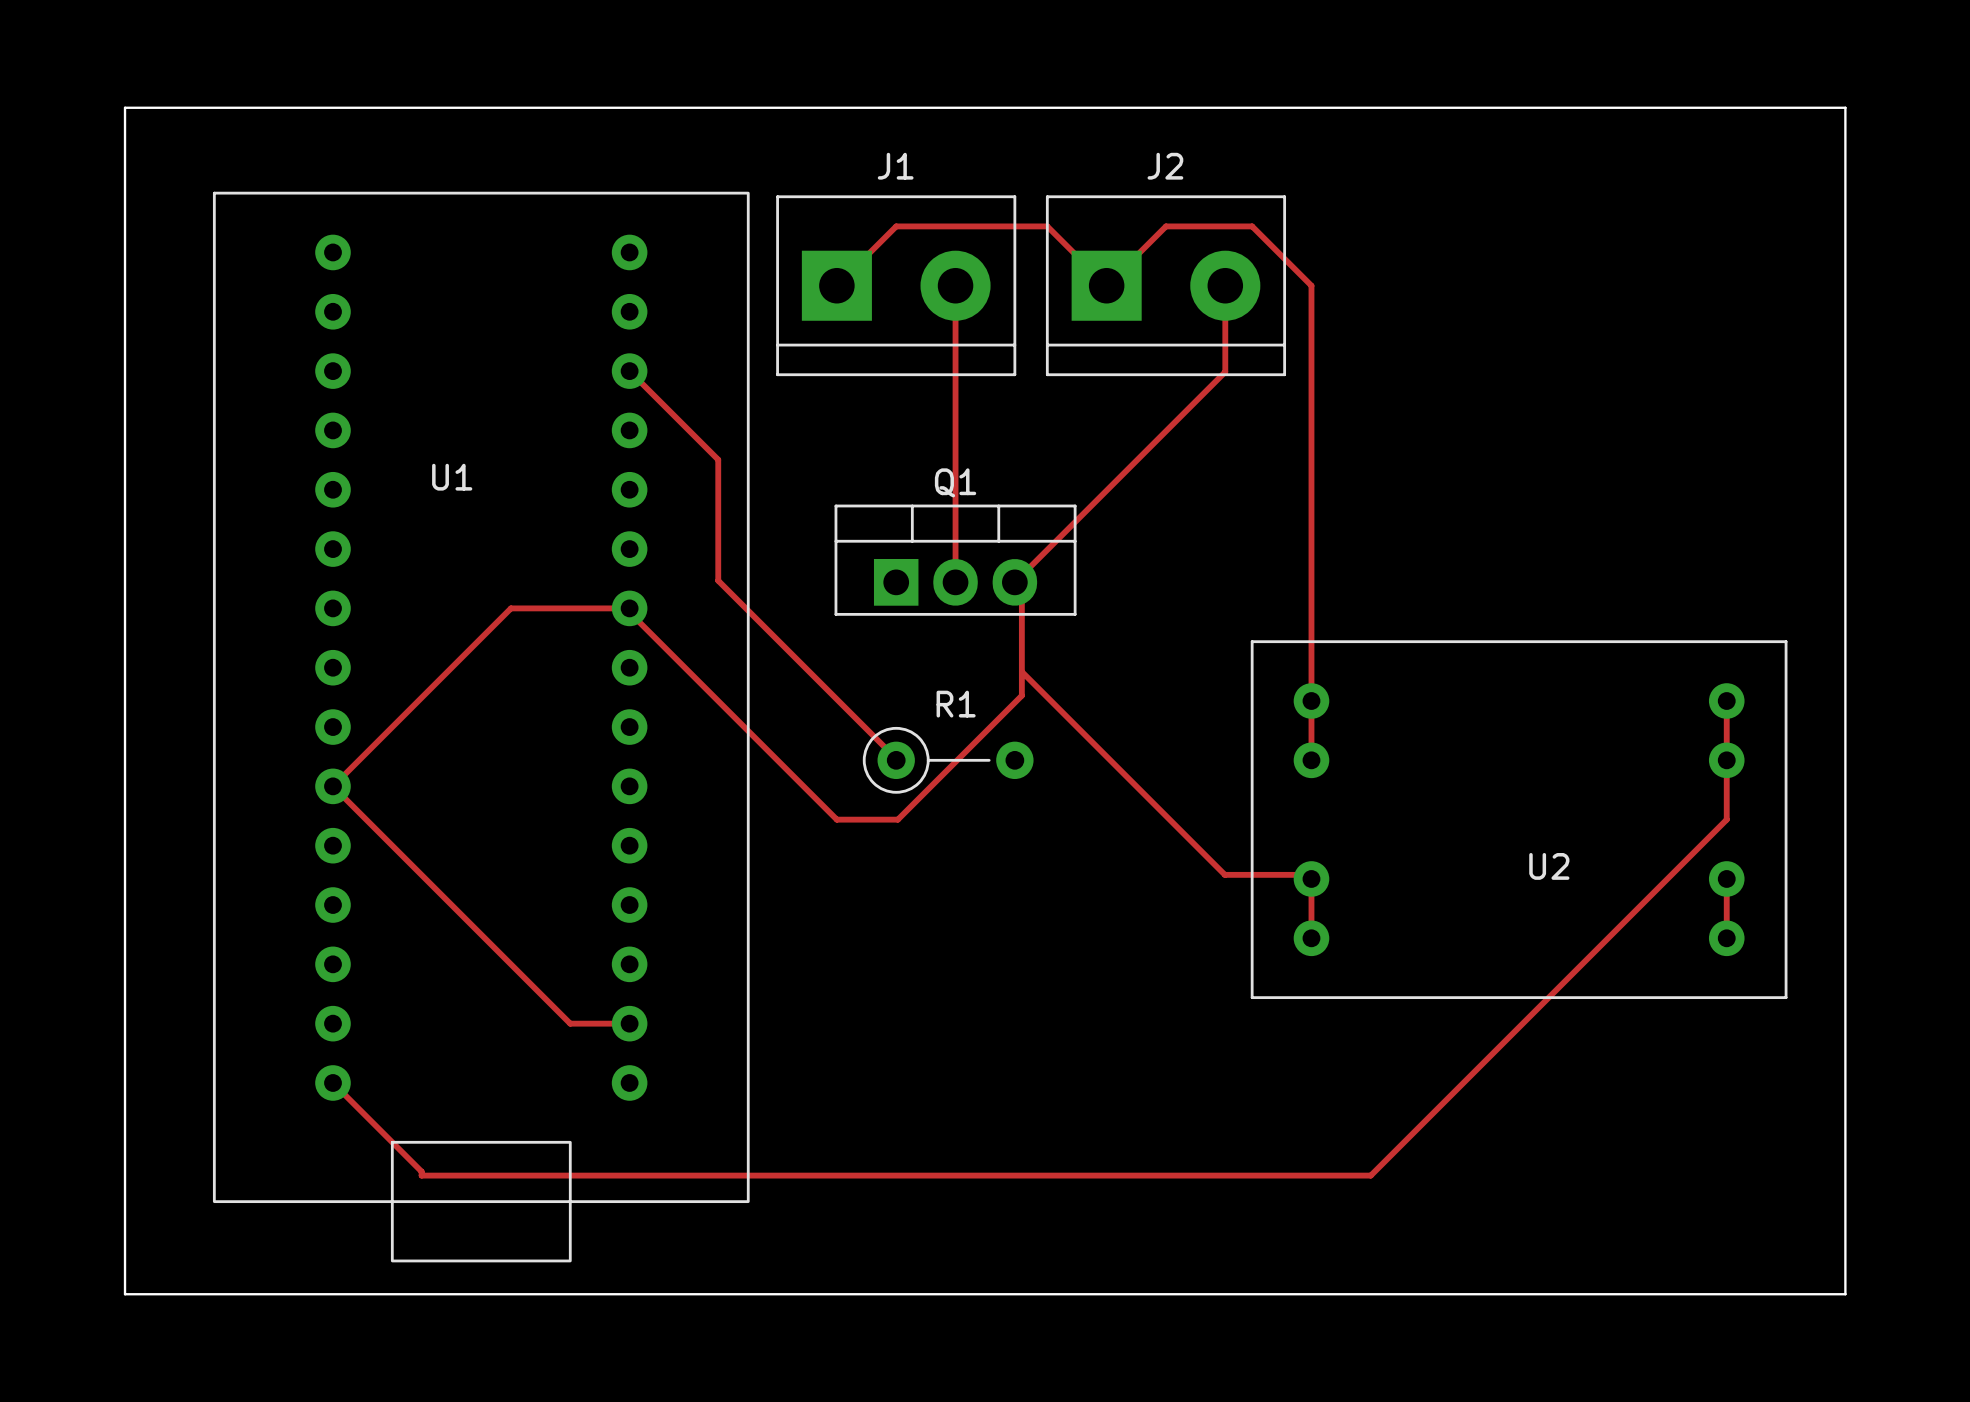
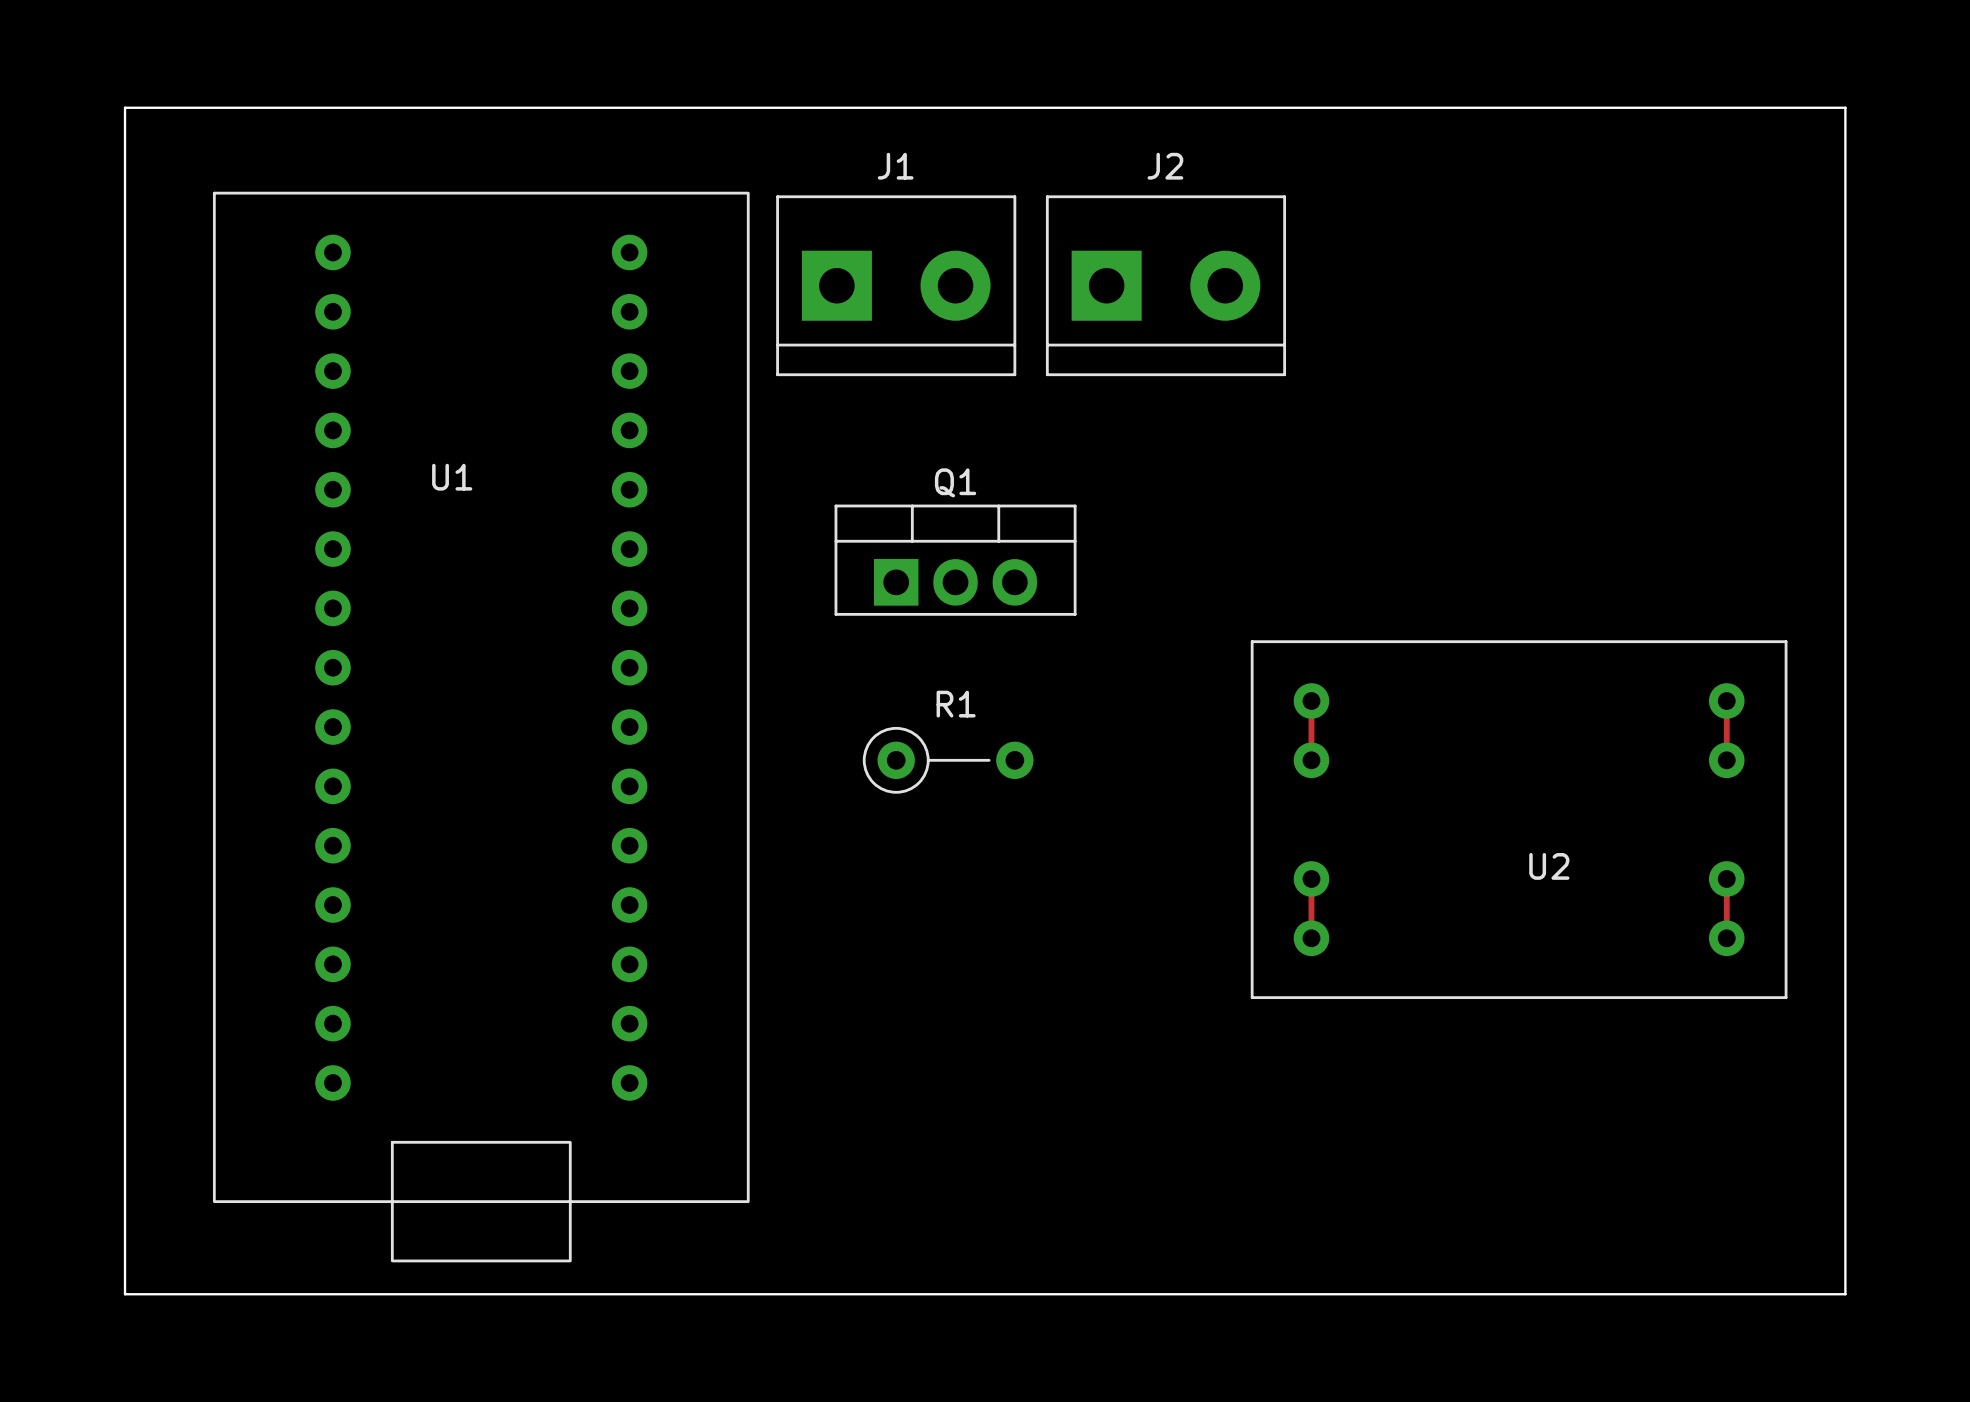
track: (836, 285) (896, 226) (1047, 226) (1106, 285) (1165, 226) (1252, 226) (1311, 285) (1311, 701) -> none
track: (955, 285) (955, 568) (948, 575) -> none
track: (1225, 285) (1225, 371) (1021, 575) -> none
track: (629, 371) (718, 459) (718, 580) (896, 760) -> none
track: (1021, 589) (1021, 695) (897, 819) (836, 819) (629, 612) (629, 608) (510, 608) (332, 786) (570, 1023) (629, 1023) -> none
track: (1021, 671) (1224, 874) (1301, 874) (1304, 871) -> none
track: (1726, 760) (1726, 819) (1370, 1175) (421, 1175) (421, 1171) (332, 1082) -> none

